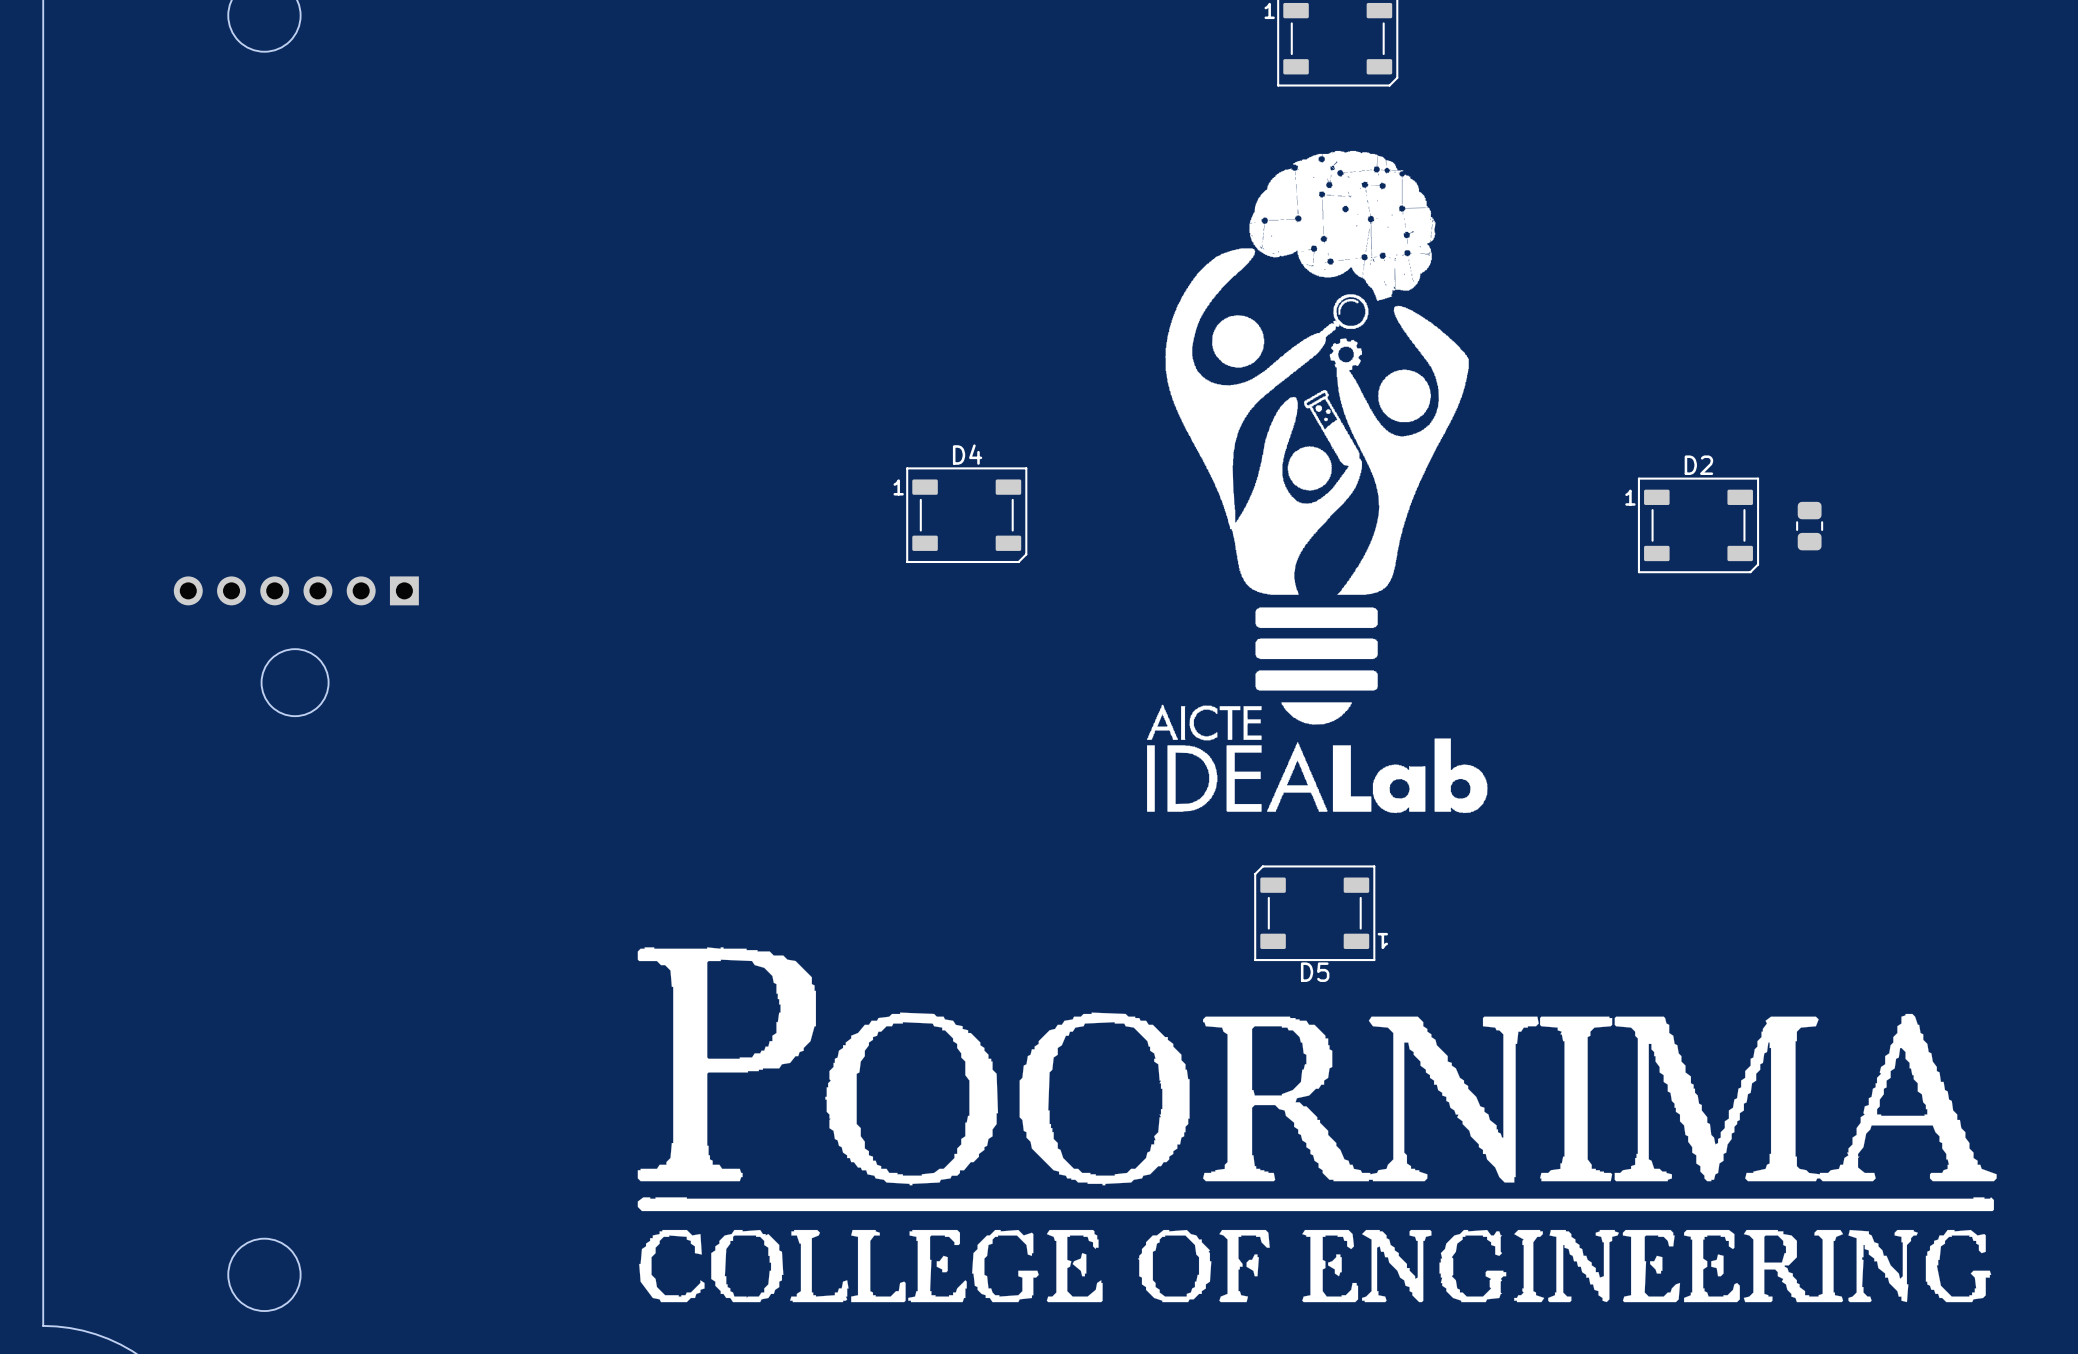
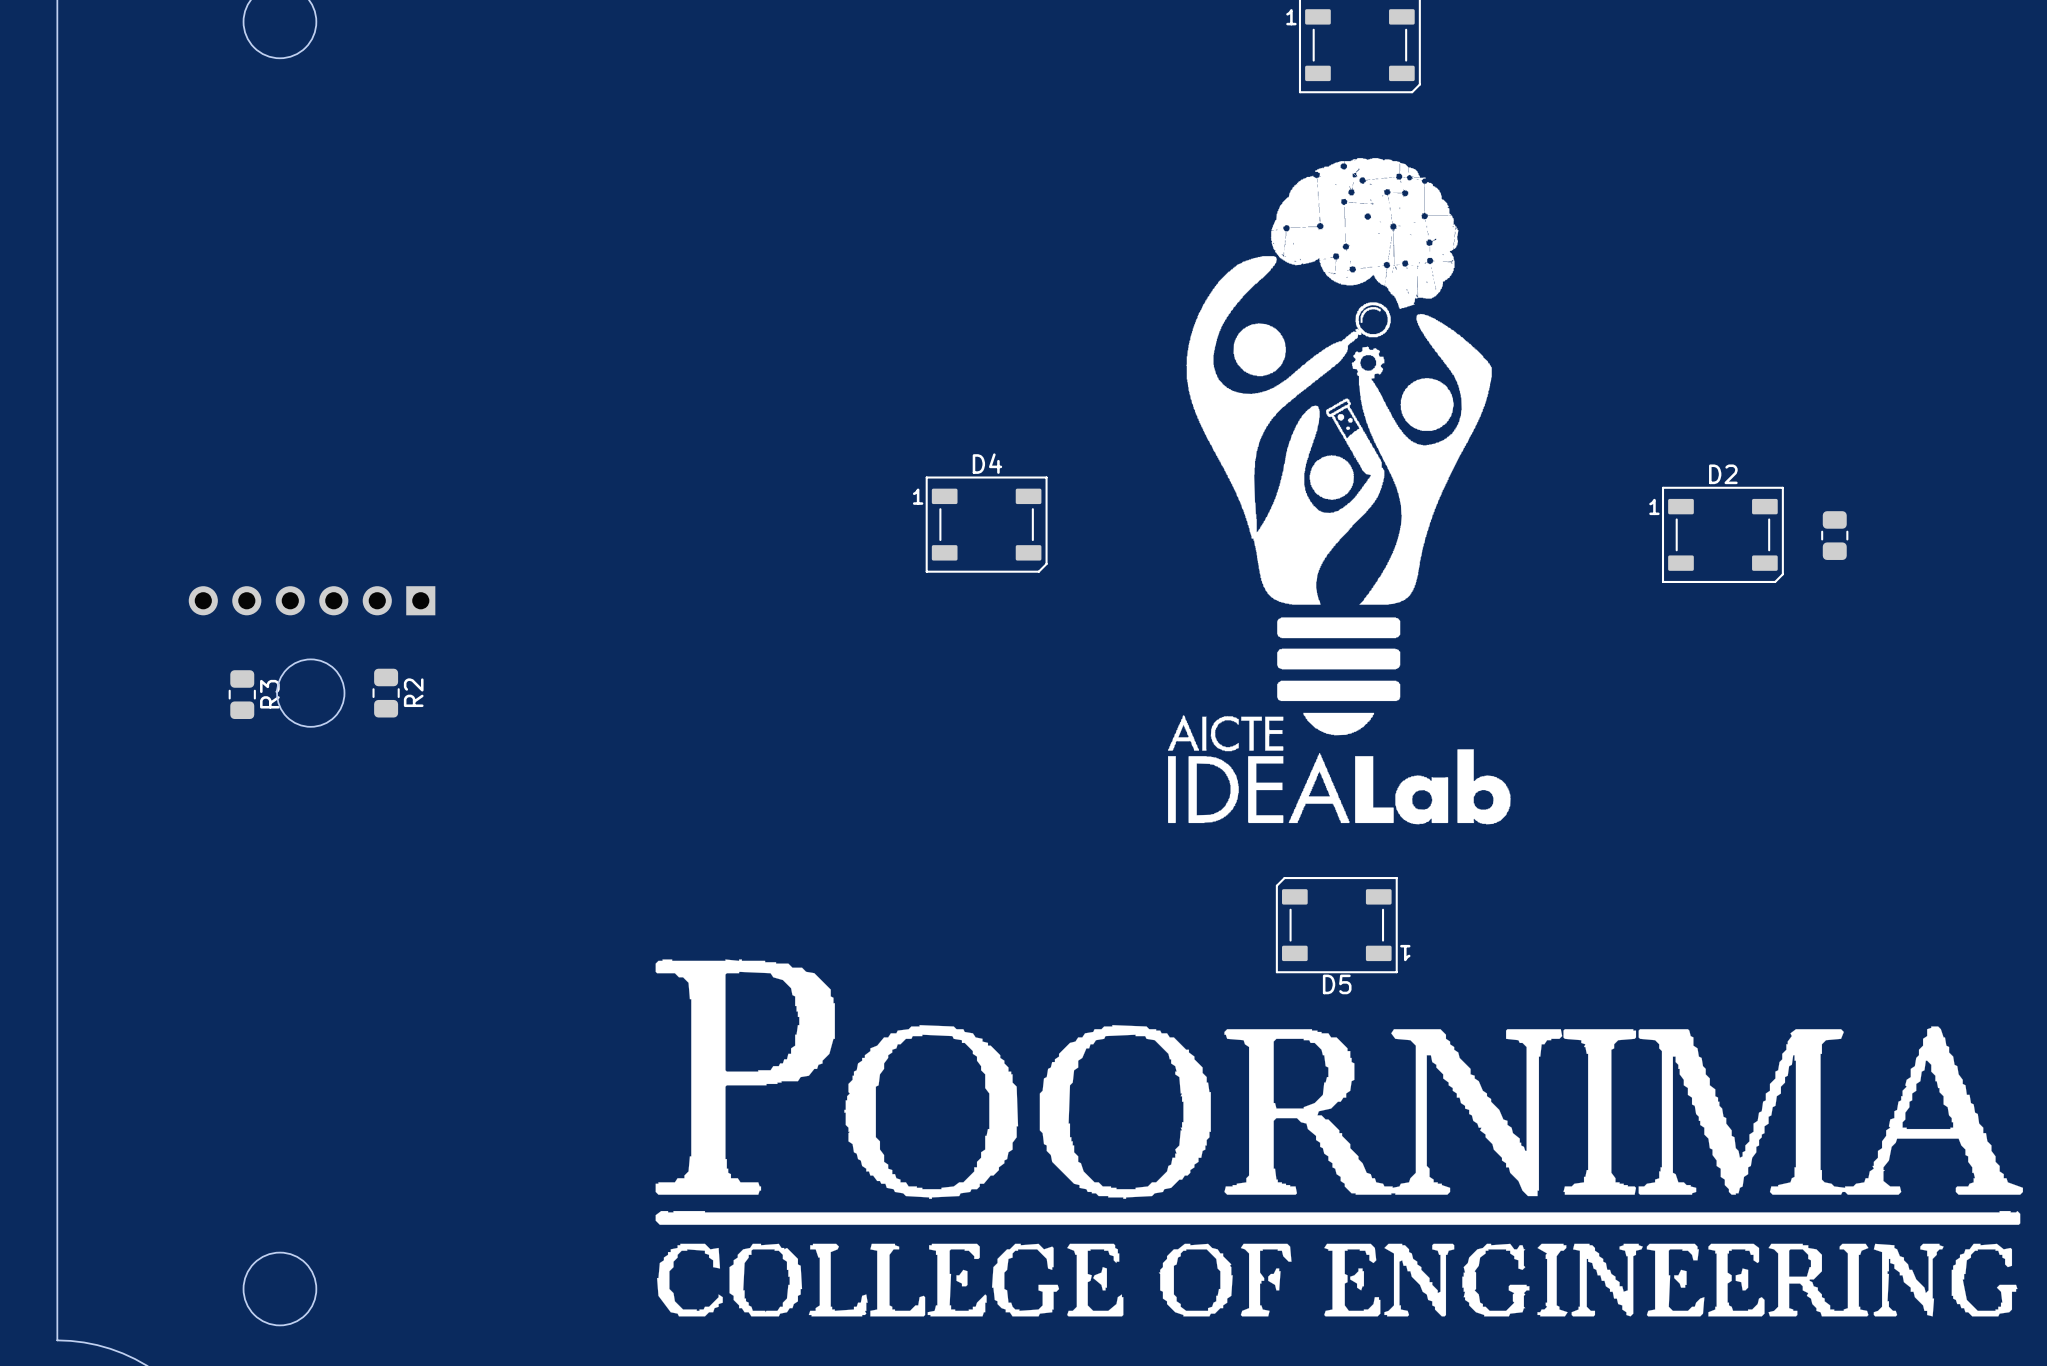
R2: none -> (386, 693)
R3: none -> (242, 694)

